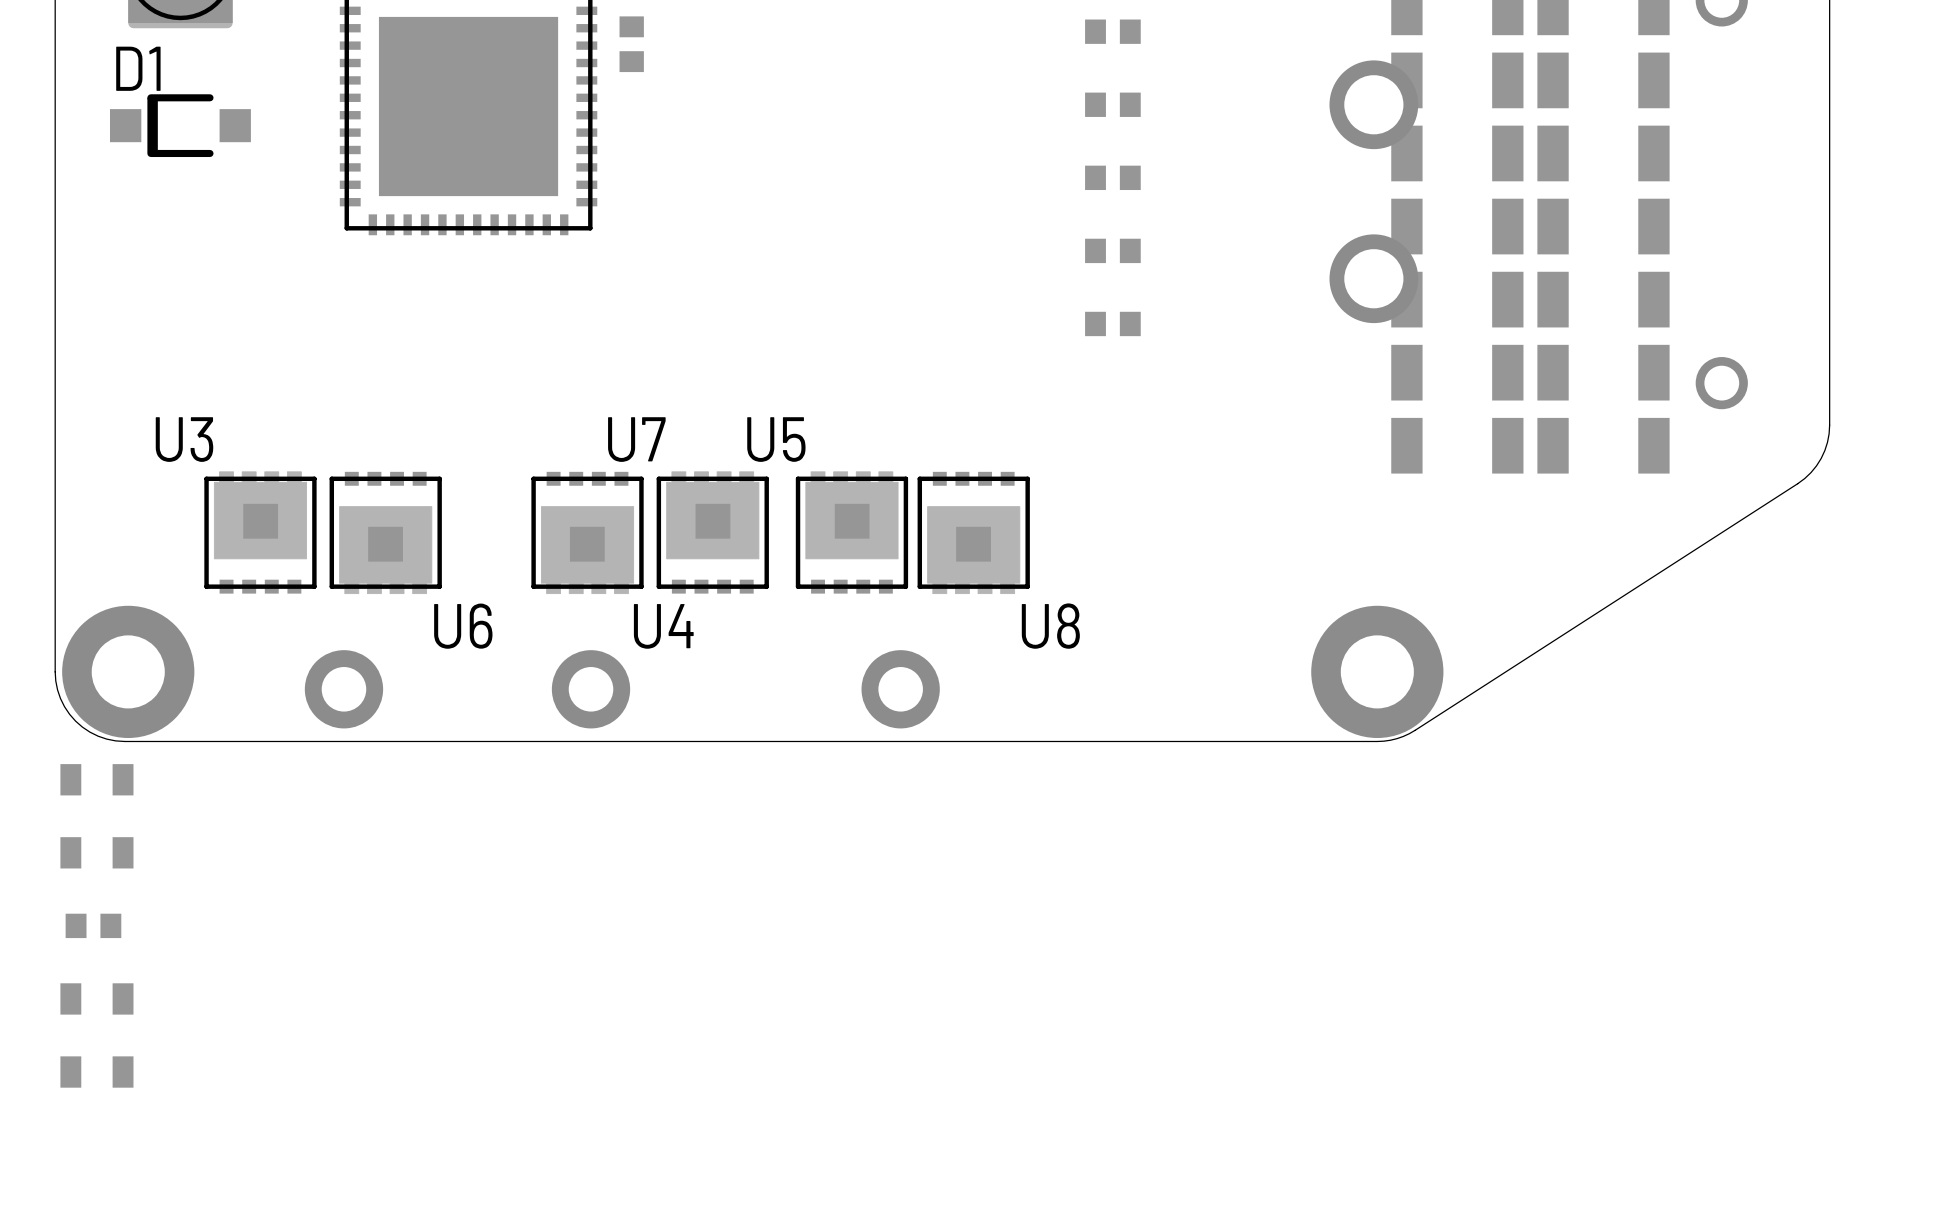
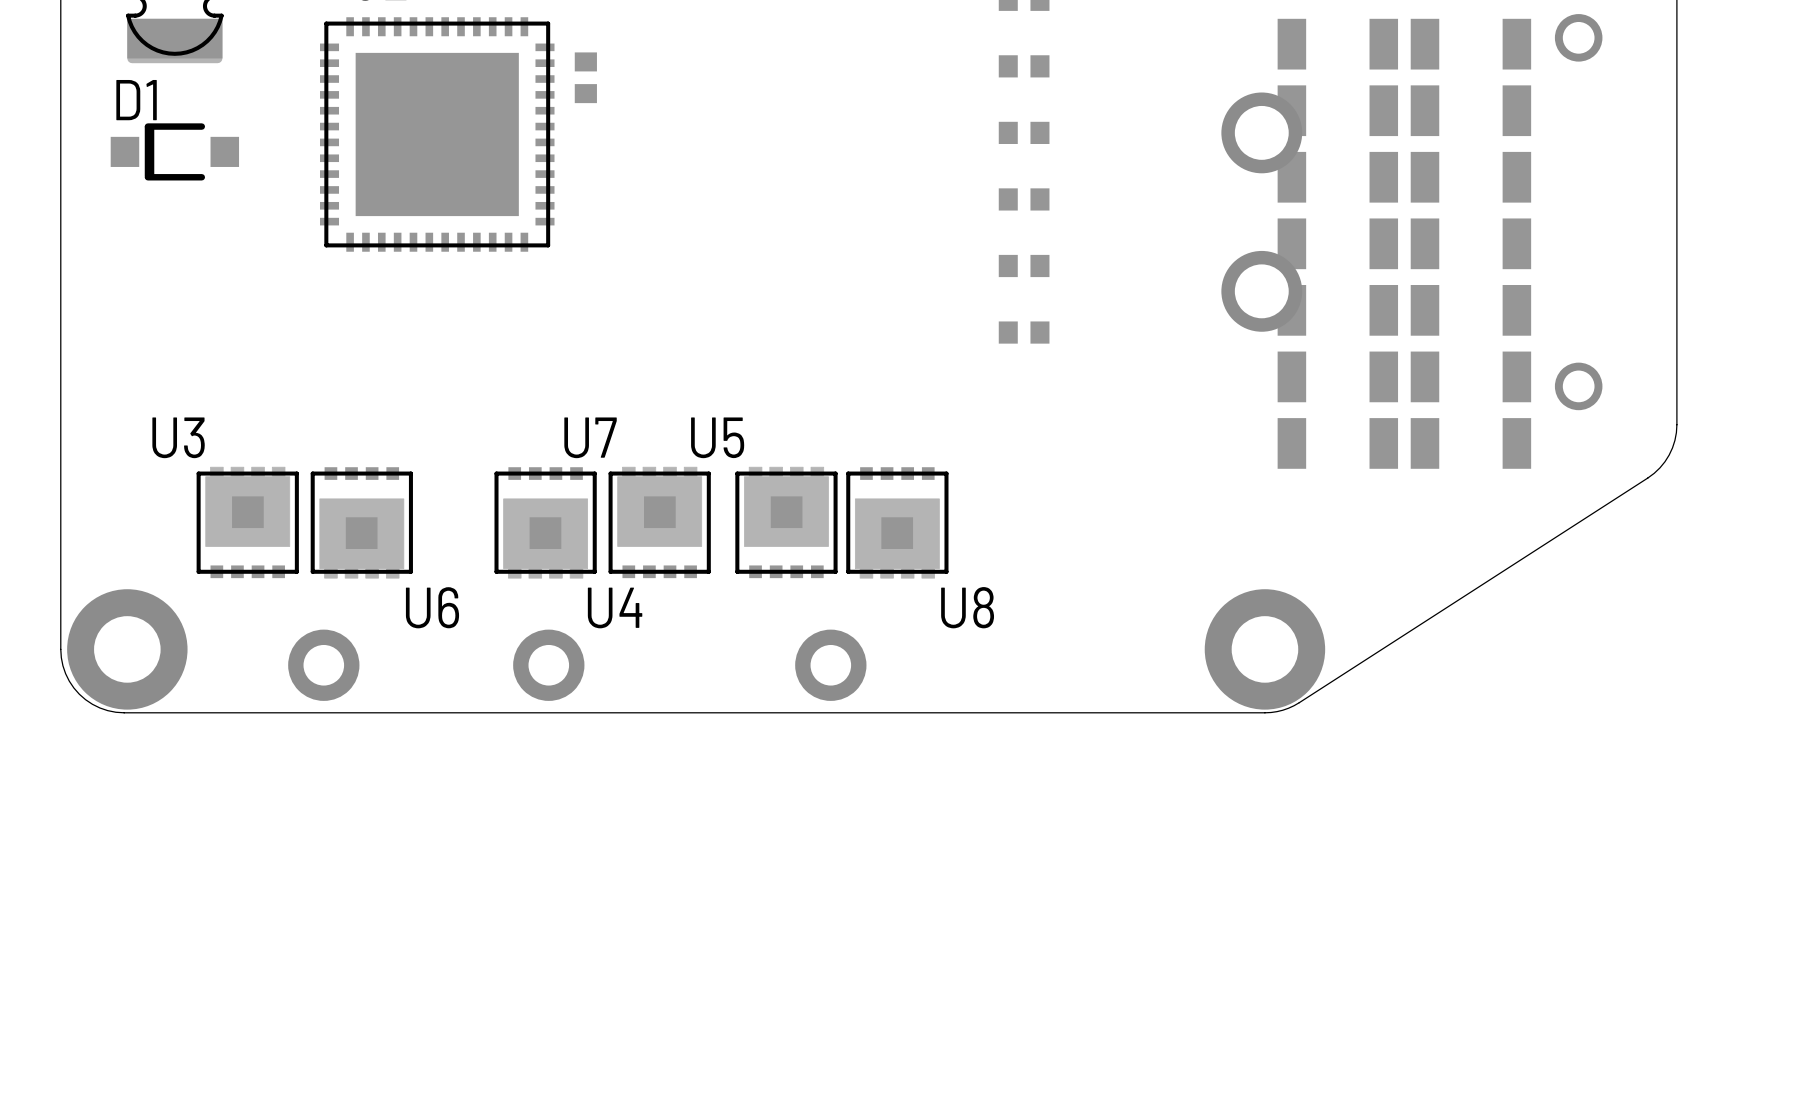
part: (96, 779) -> none
part: (96, 852) -> none
part: (93, 925) -> none
part: (96, 998) -> none
part: (96, 1072) -> none

